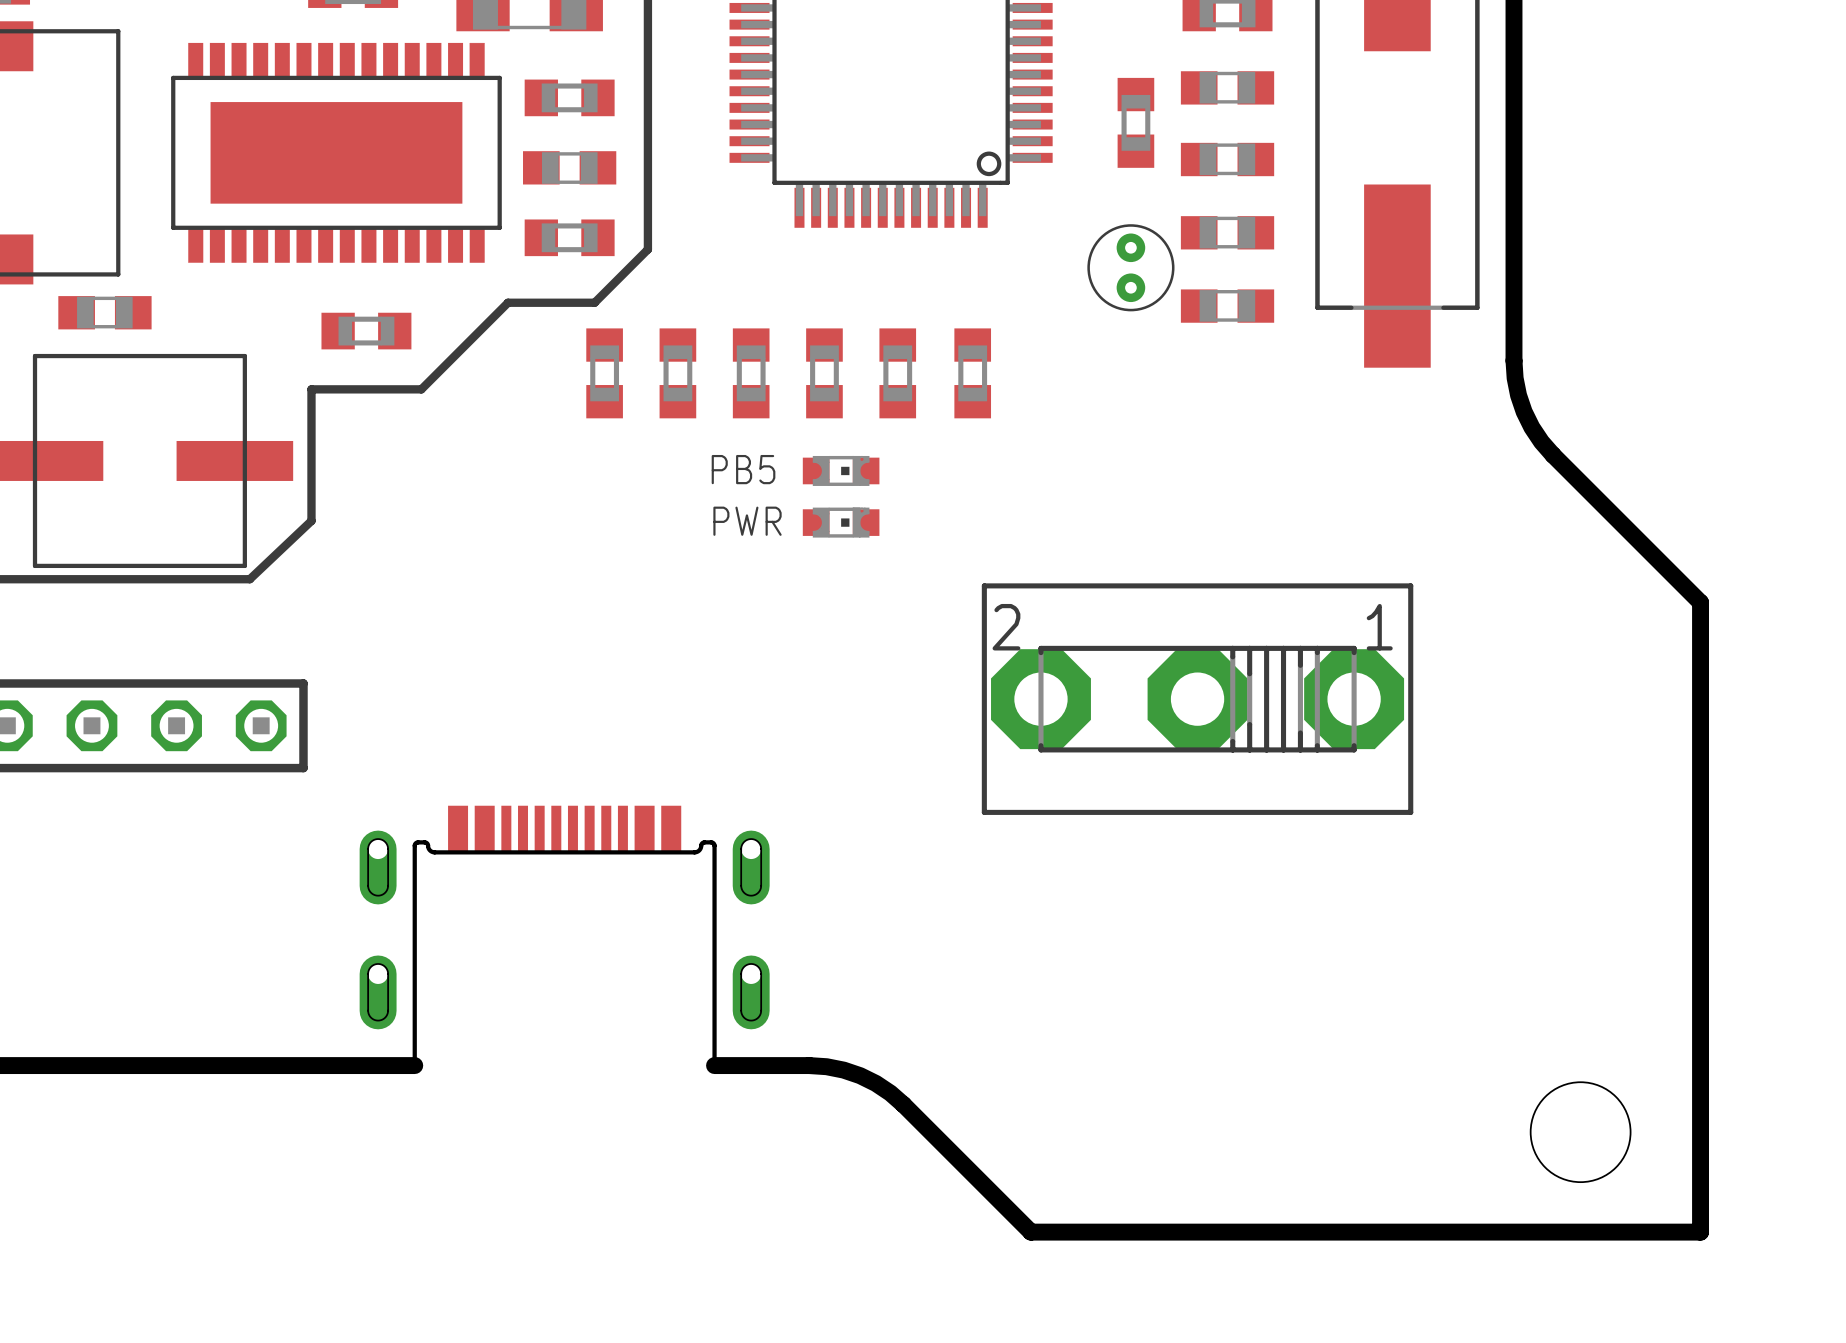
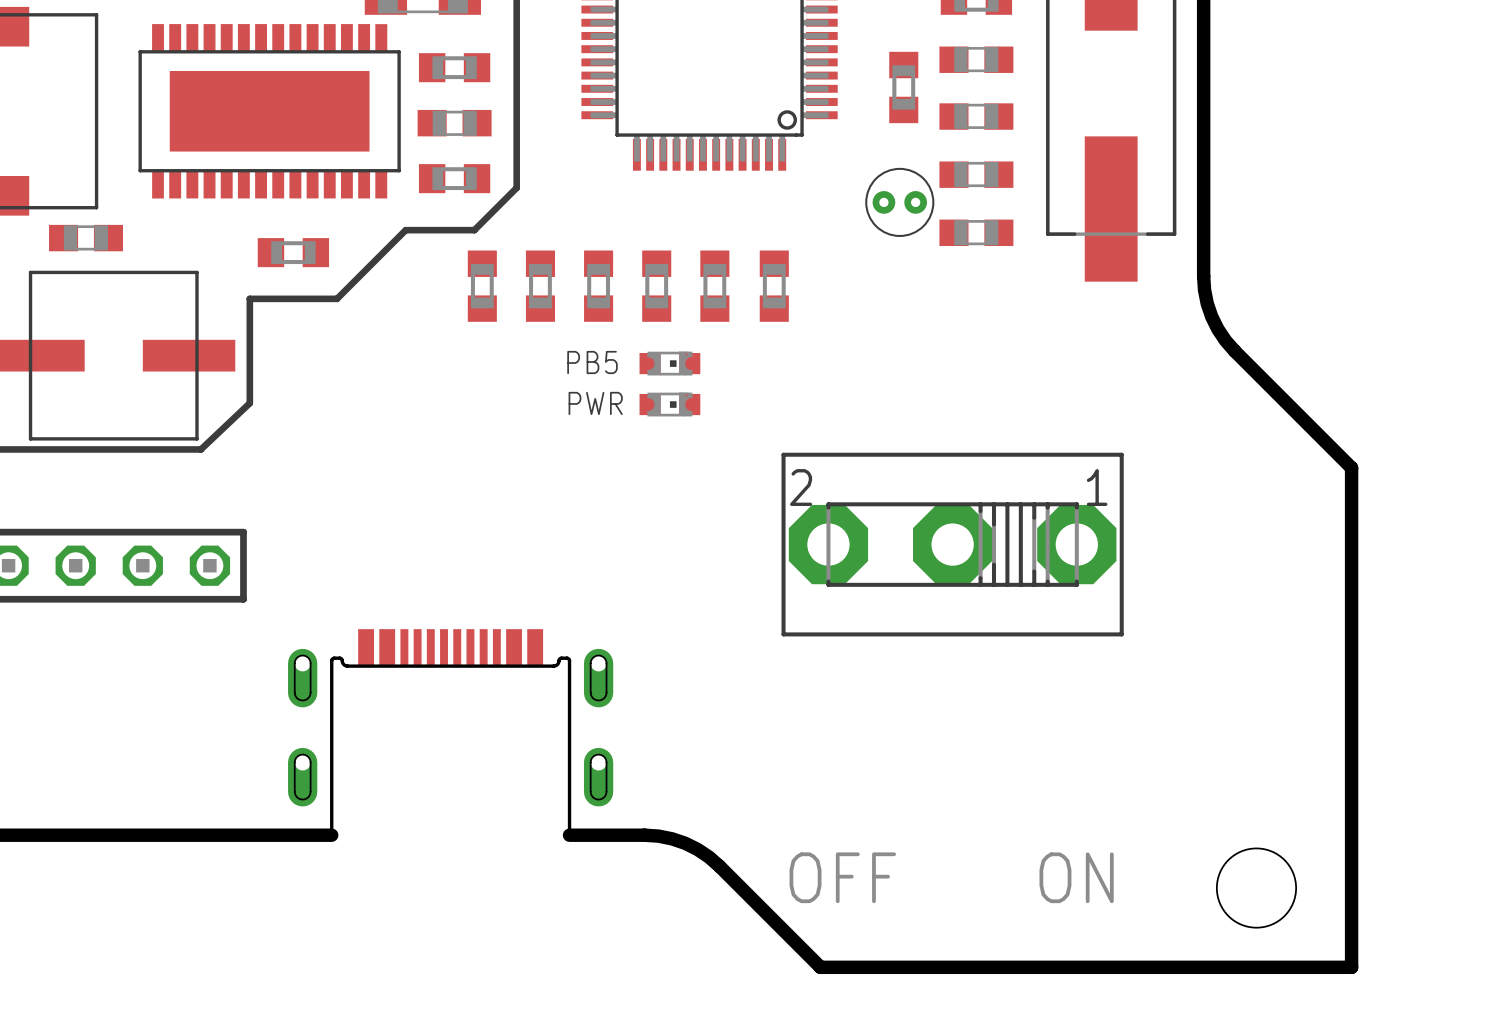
part rotation: 0° (1130, 267) -> 90° clockwise (899, 202)
text: none -> OFF (842, 877)
text: none -> ON (1076, 877)

